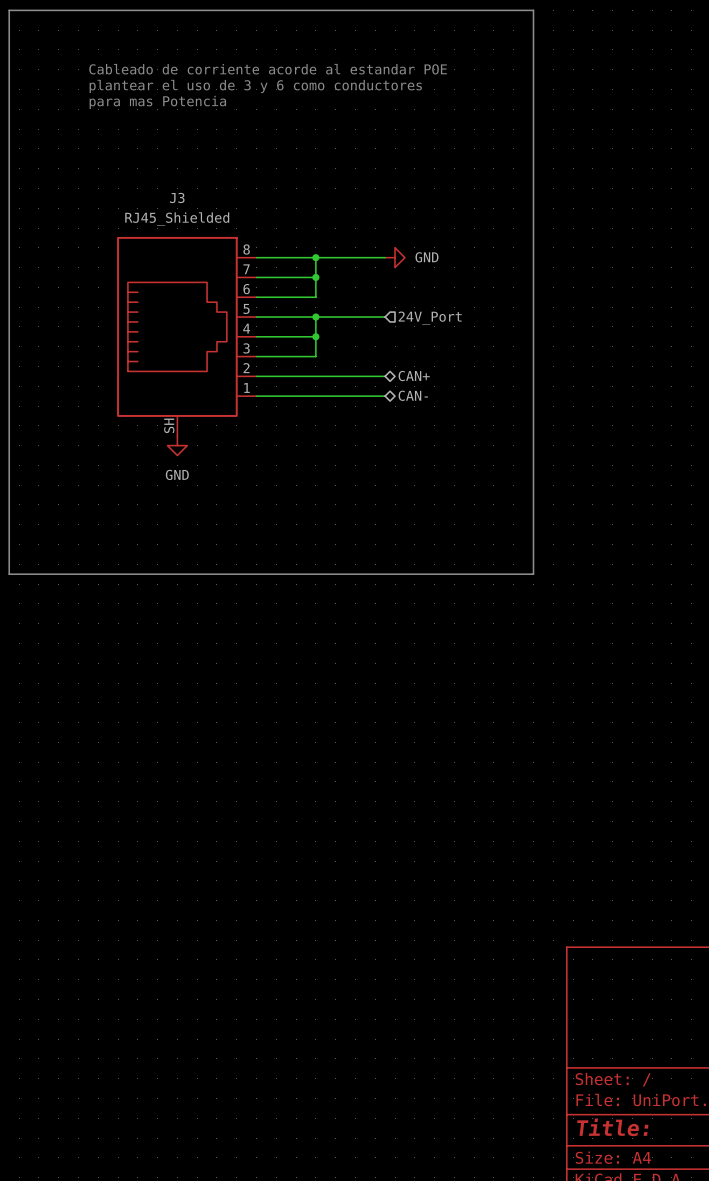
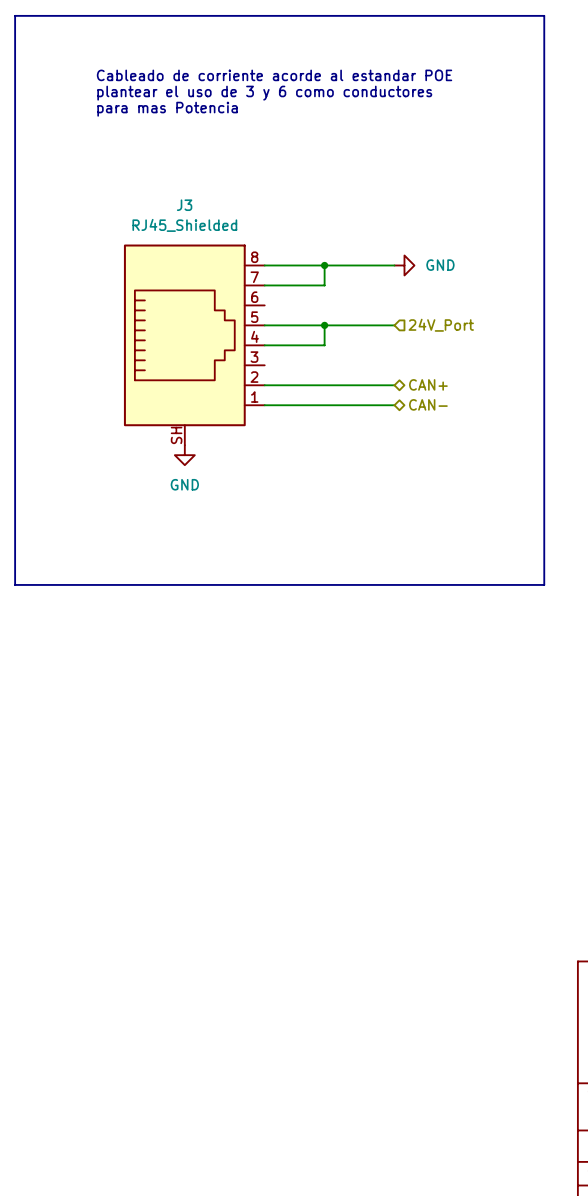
wire: (315, 277) (315, 297) (256, 297) -> none
junction: (315, 277) -> none
wire: (315, 336) (315, 356) (256, 356) -> none
junction: (315, 336) -> none

